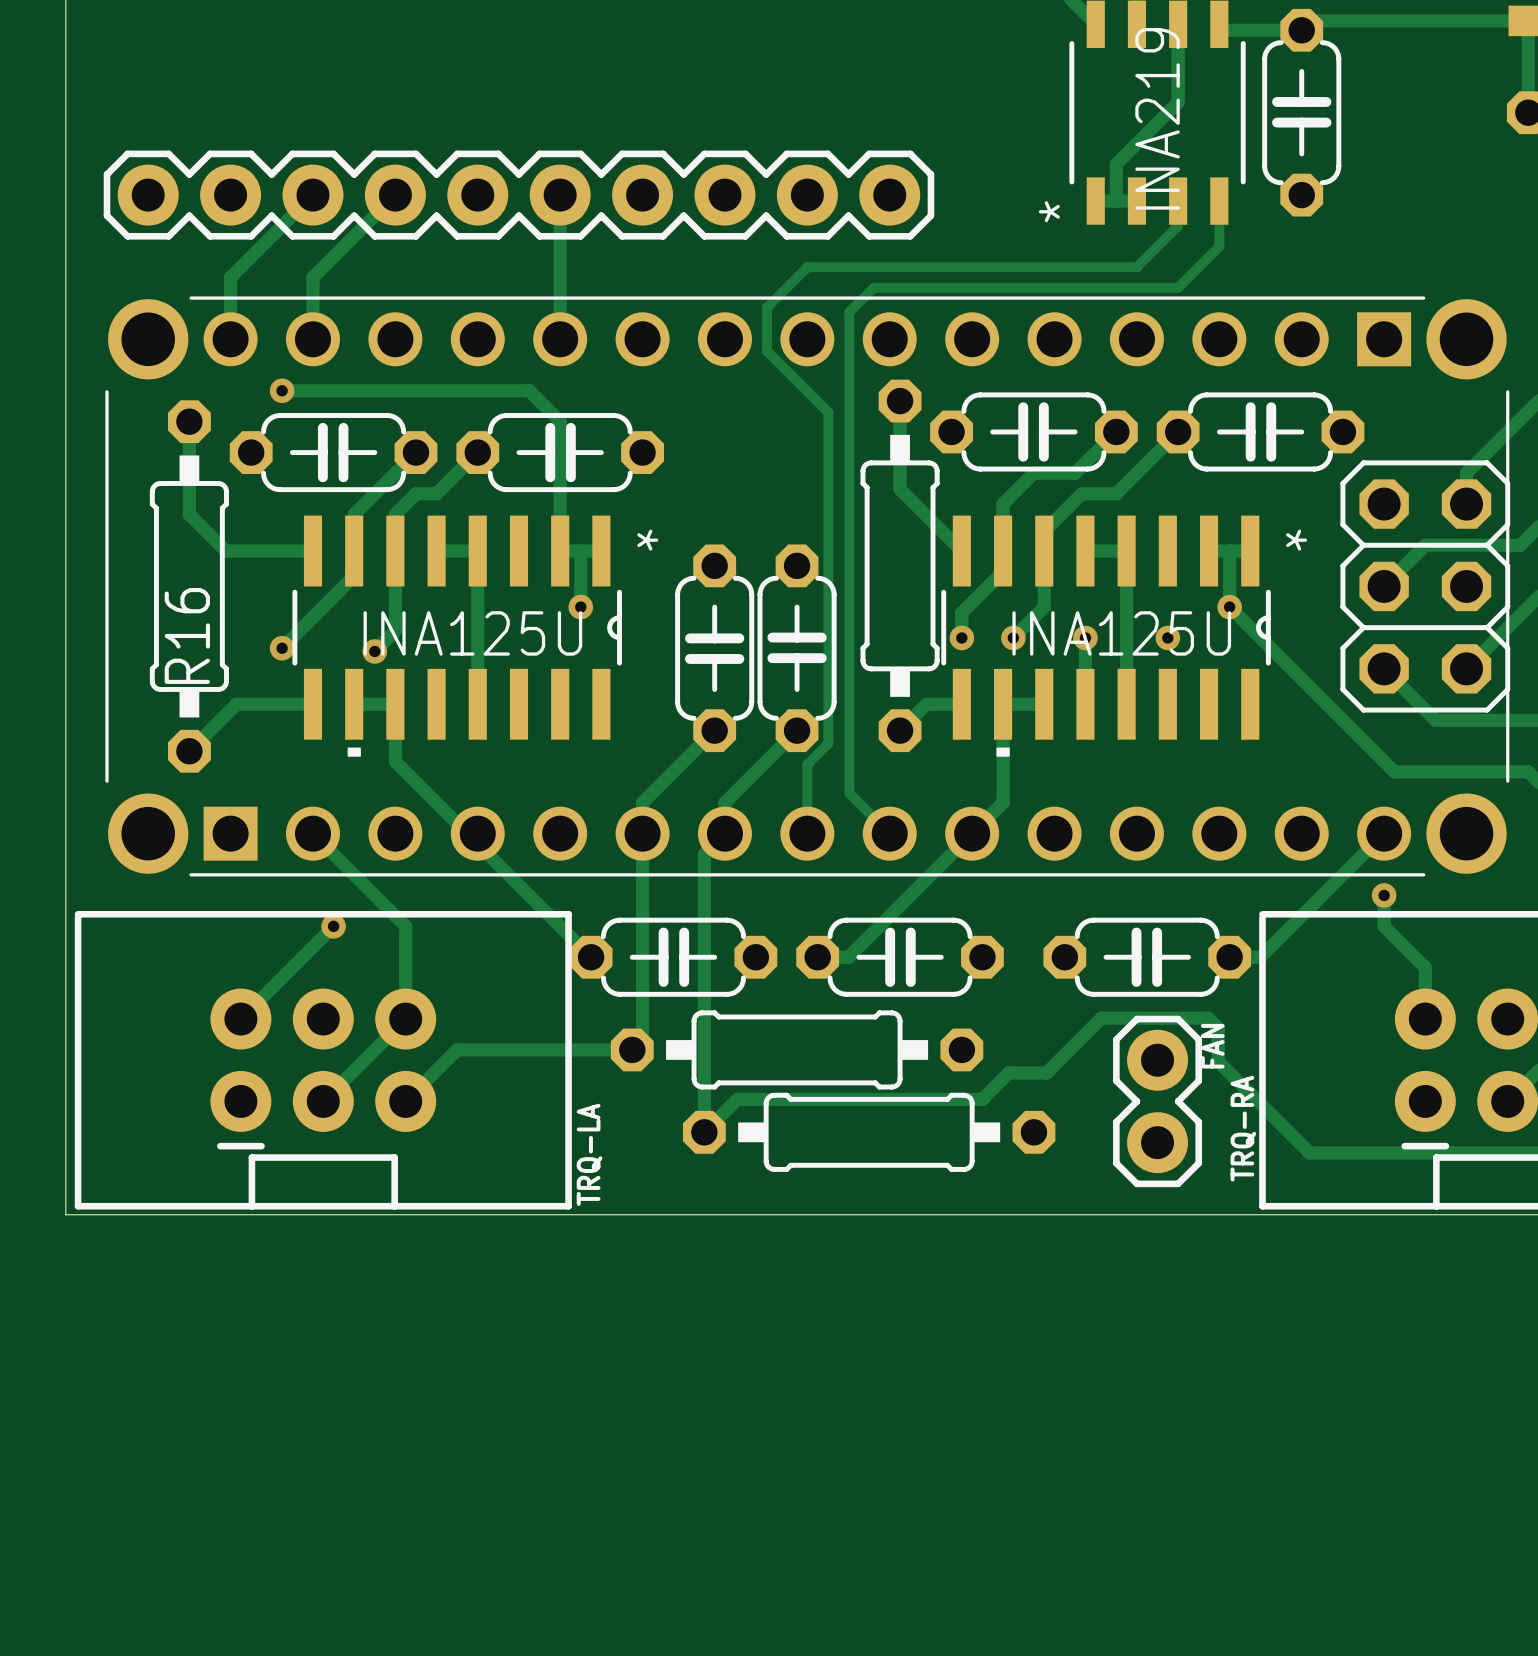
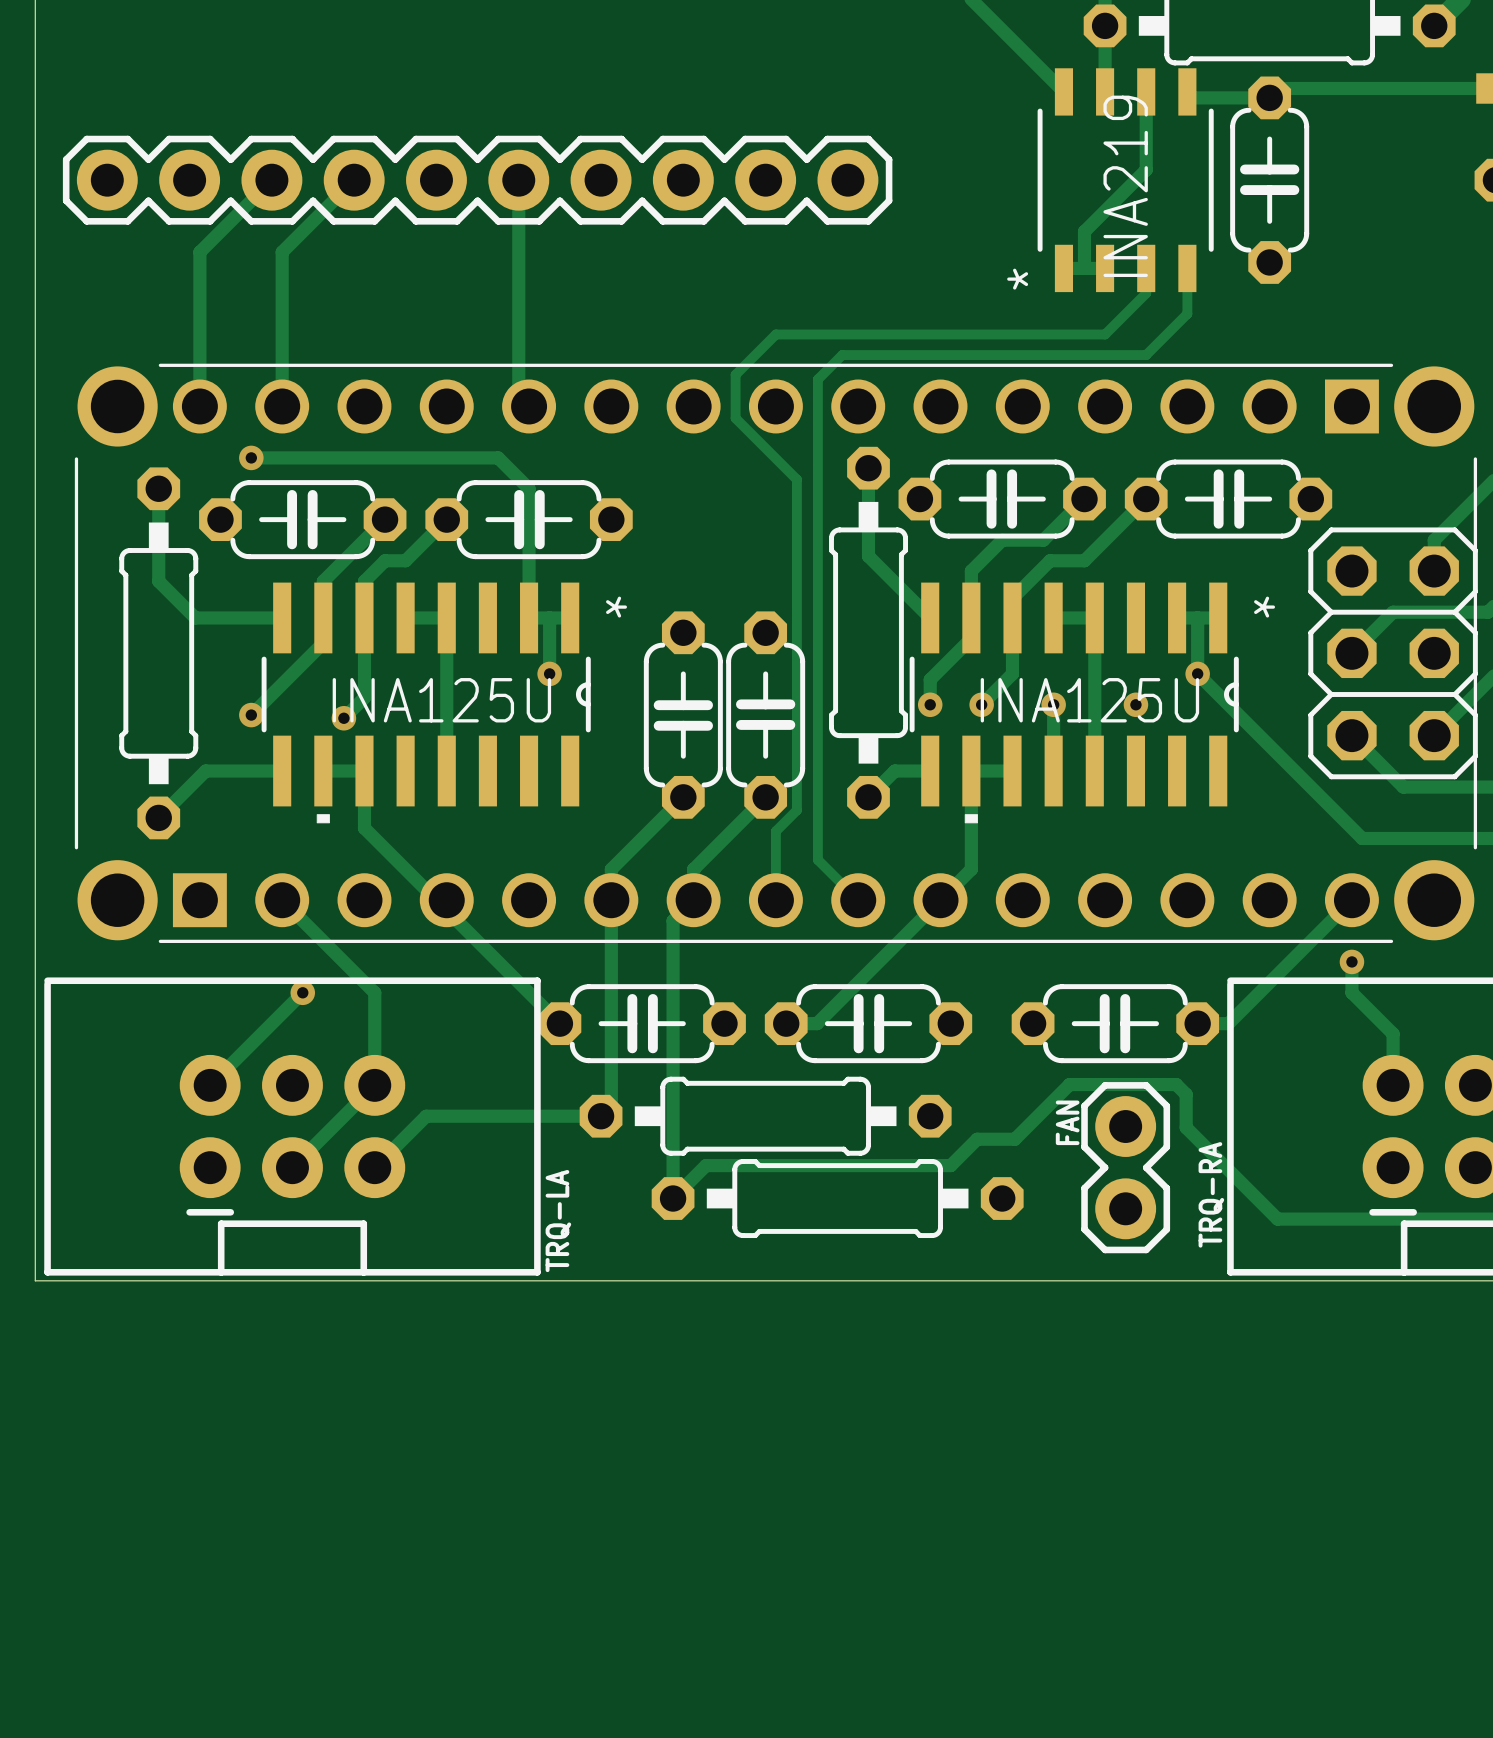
track: (313, 195) (230, 277) -> (271, 180) (199, 252) (199, 344)
track: (395, 195) (313, 277) -> (354, 180) (282, 252) (282, 344)
part position: (518, 195) -> (477, 180)
track: (560, 195) (560, 339) -> (518, 180) (518, 396) (529, 406)
R16 name: R16 (187, 635) -> none
FAN name position: FAN (1212, 1046) -> FAN (1067, 1122)

